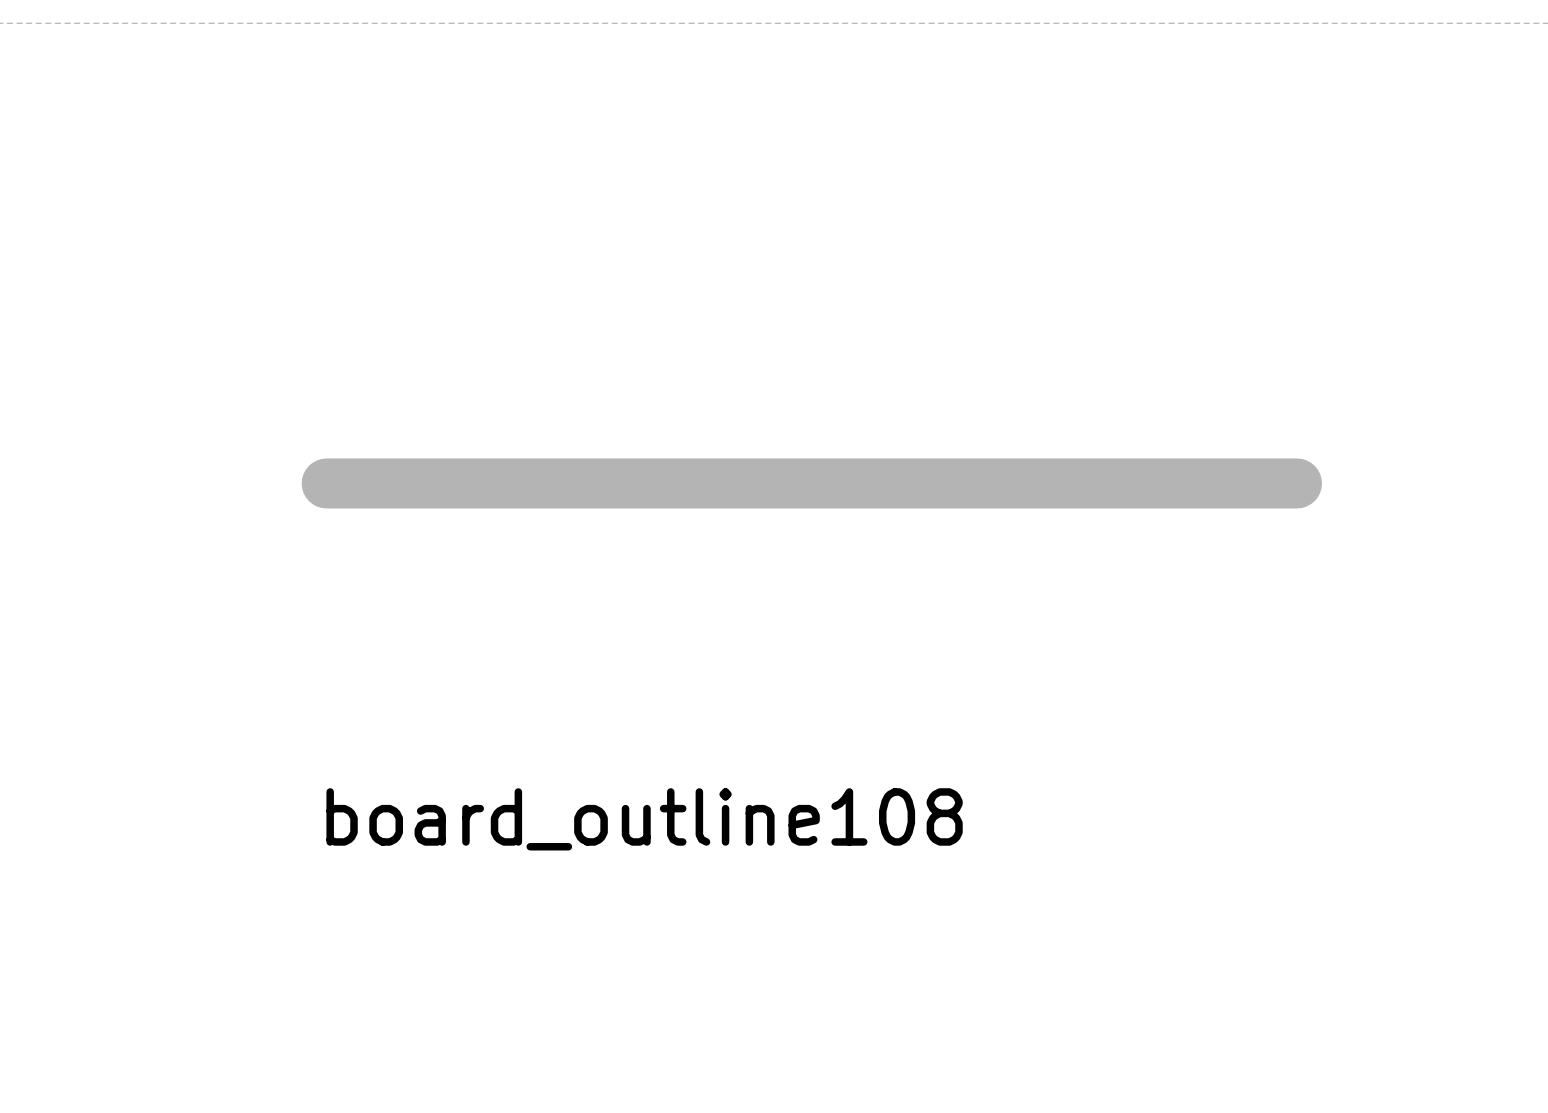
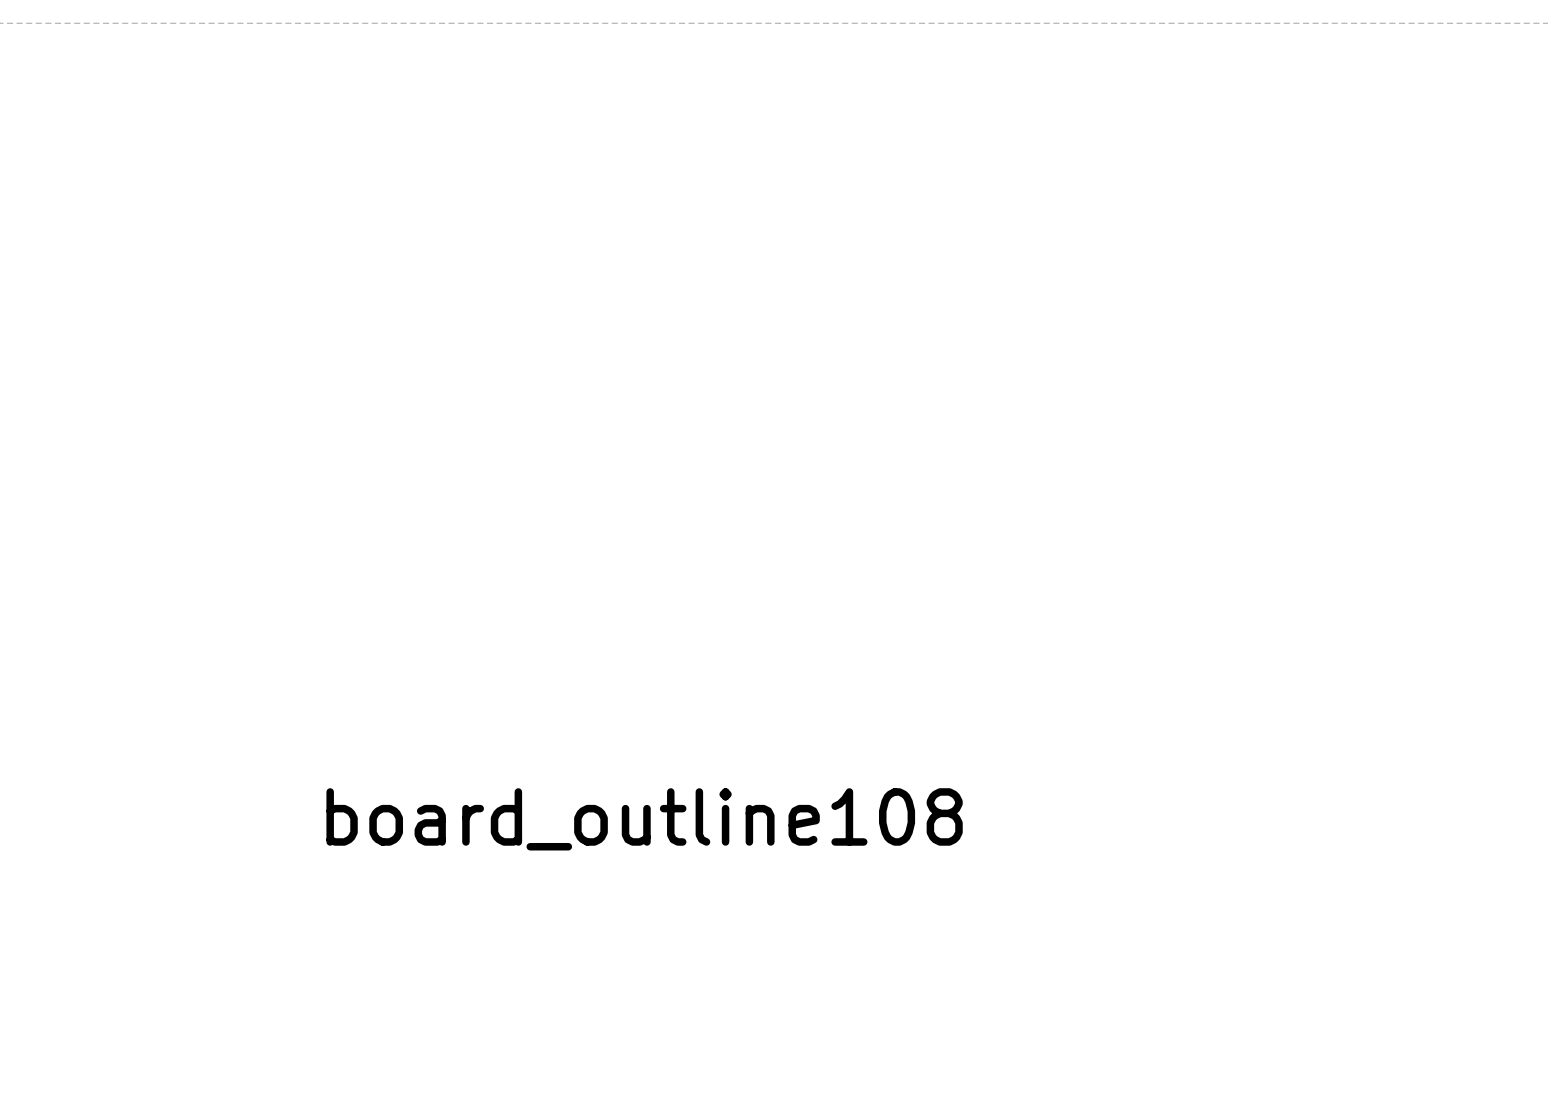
track: (326, 483) (1296, 483) -> none

